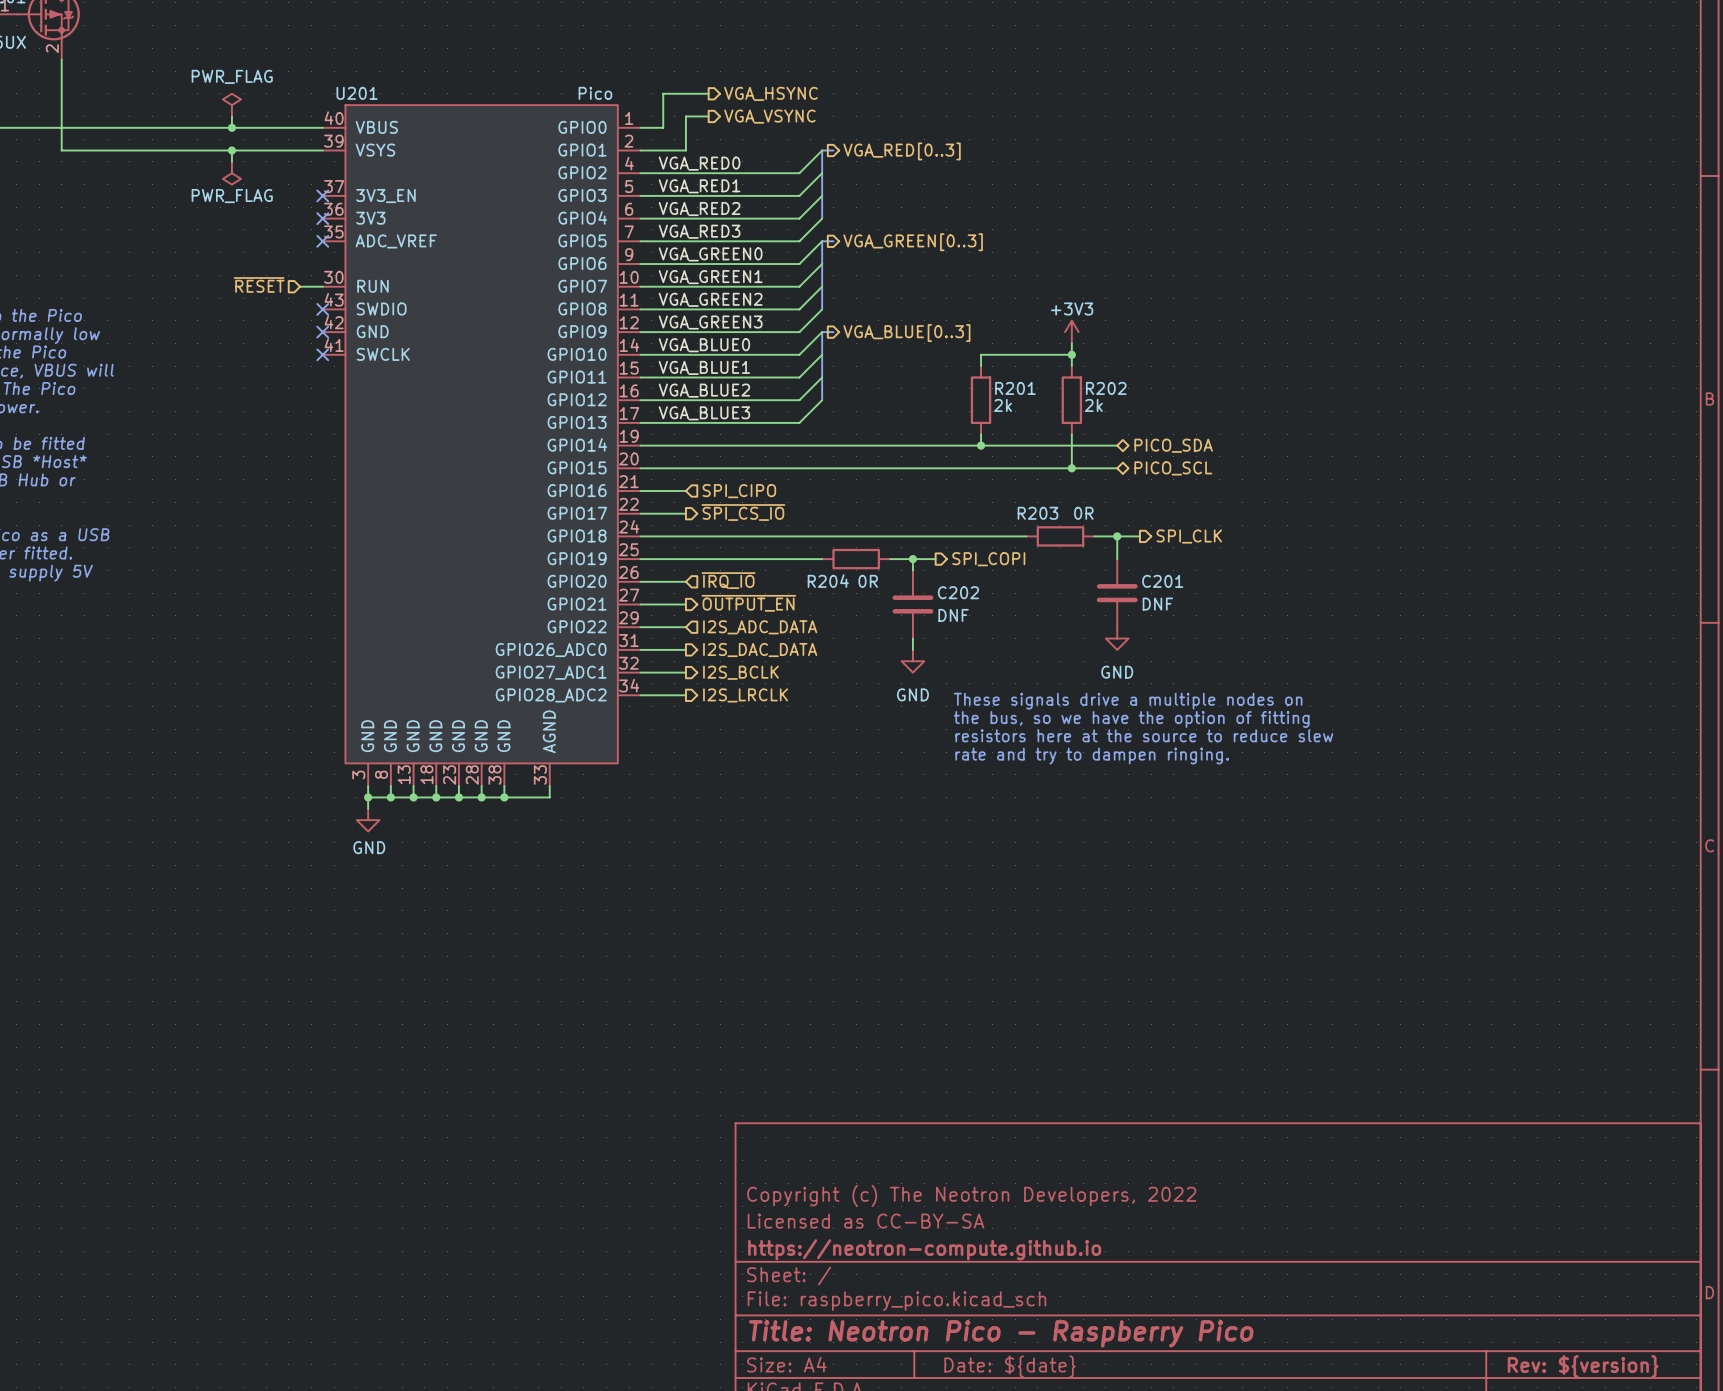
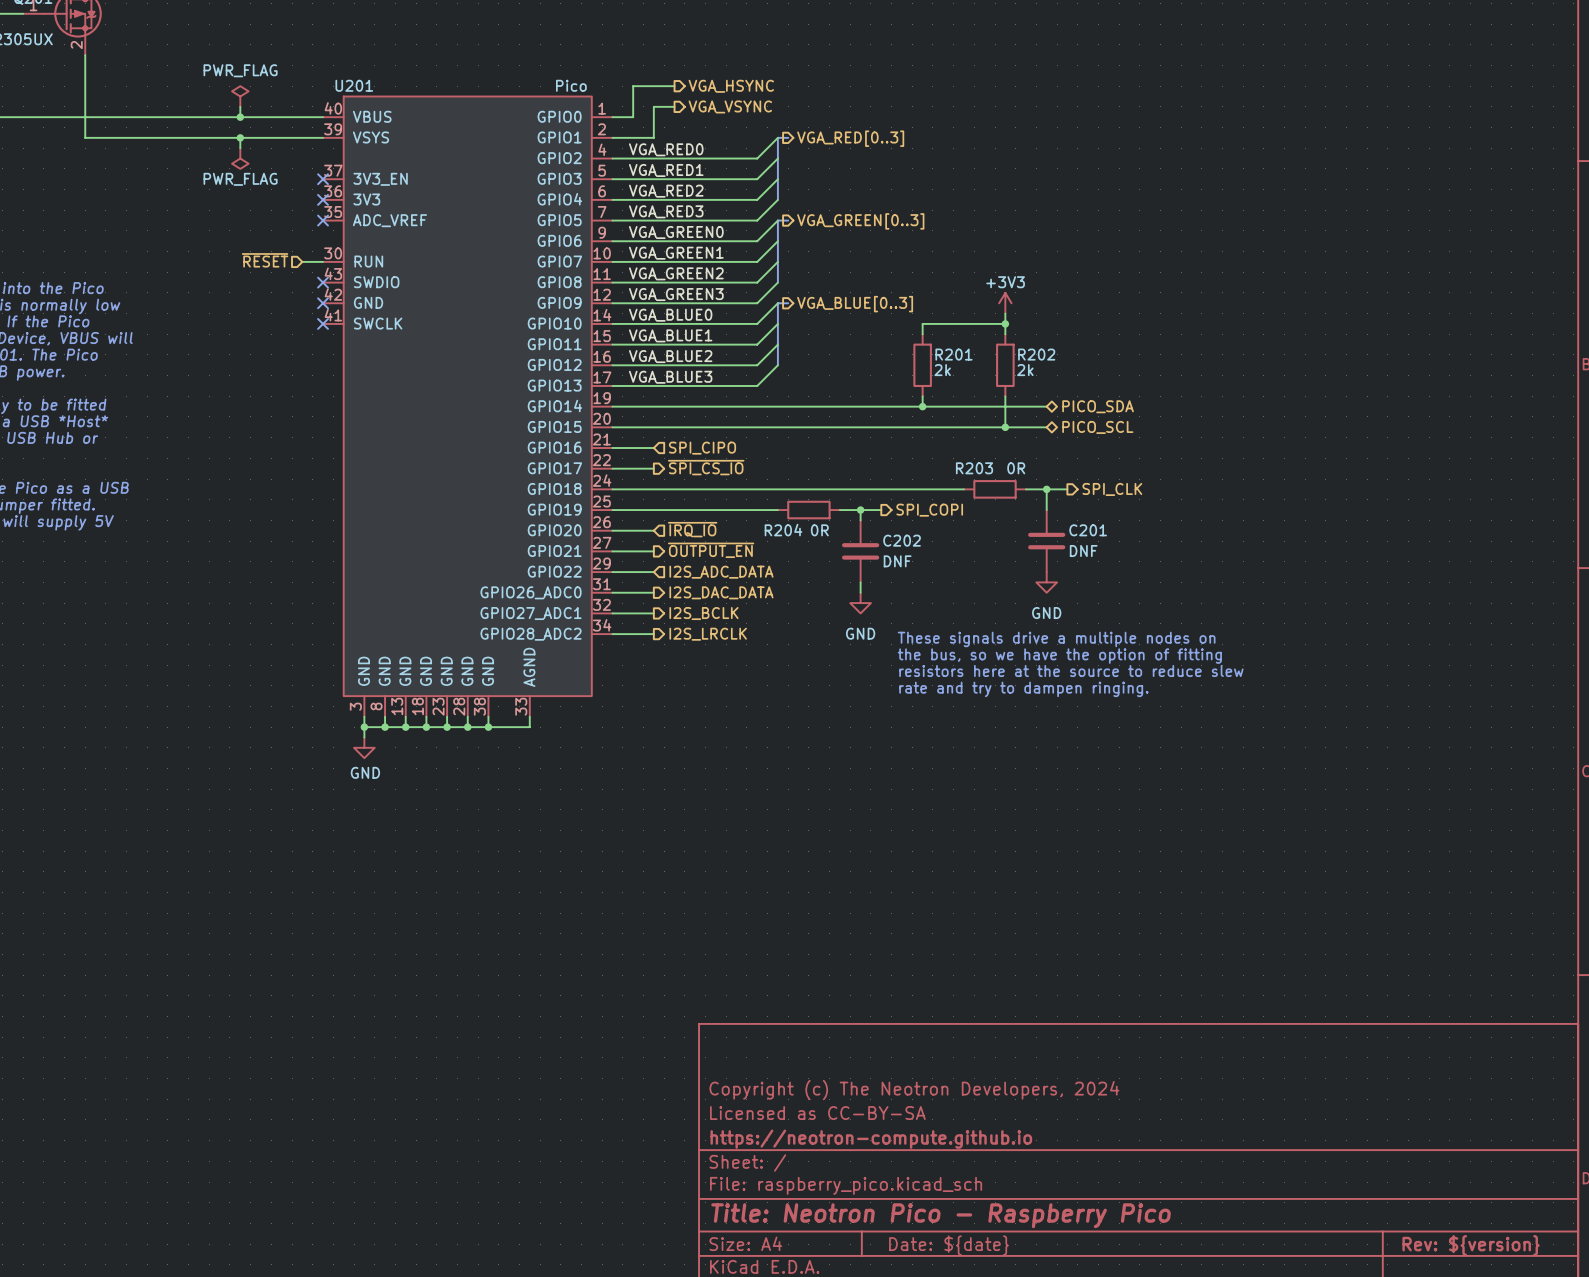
title block: Copyright (c) The Neotron Developers, 2022 (971, 1195) -> Copyright (c) The Neotron Developers, 2024 (914, 1090)

